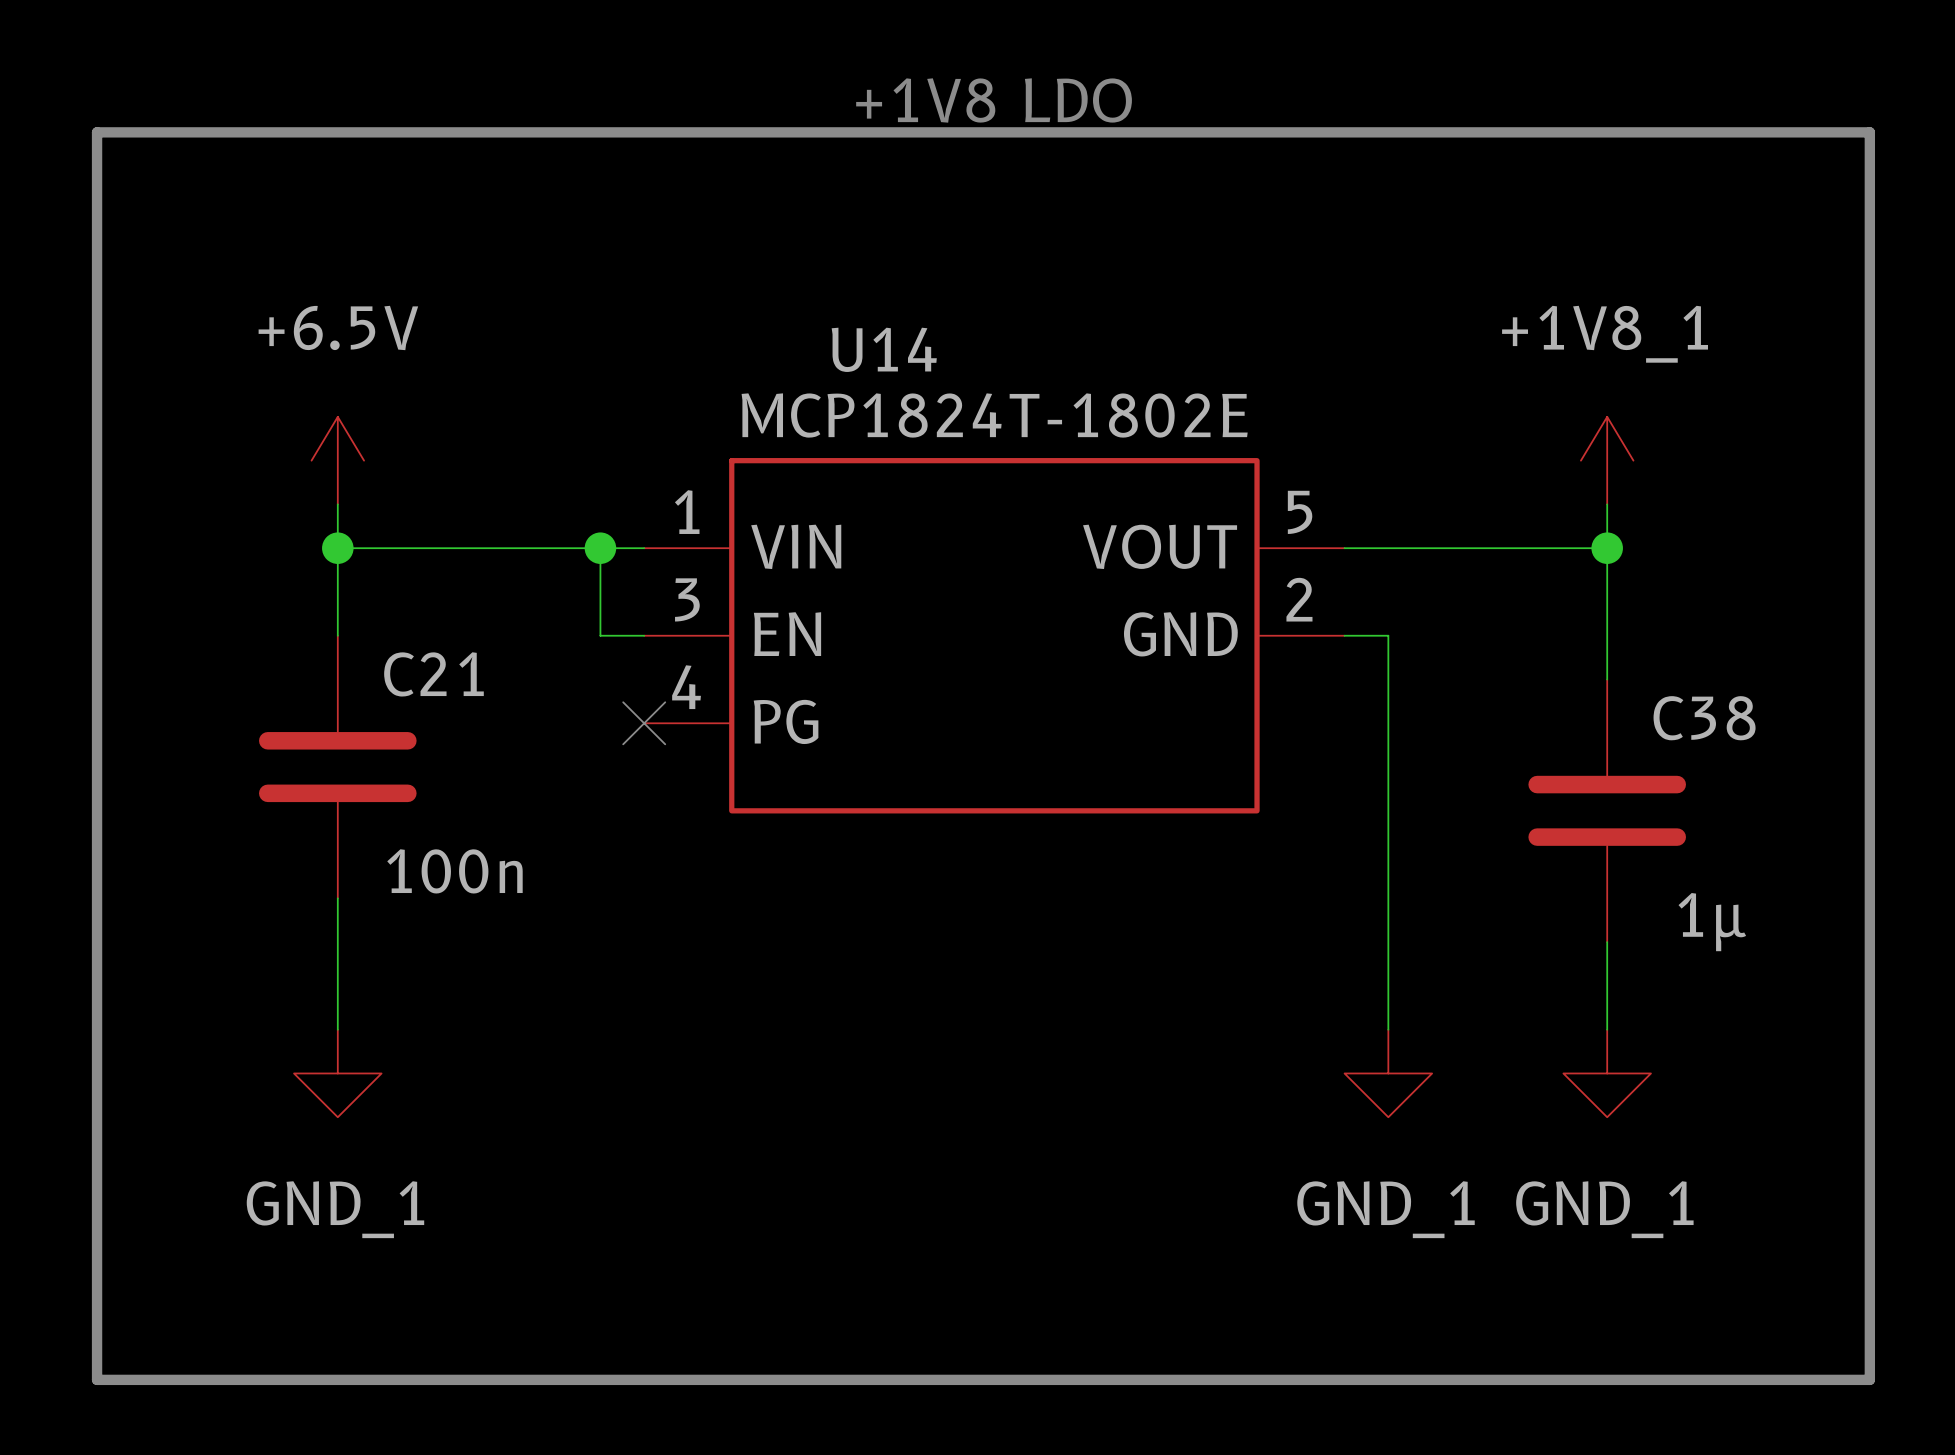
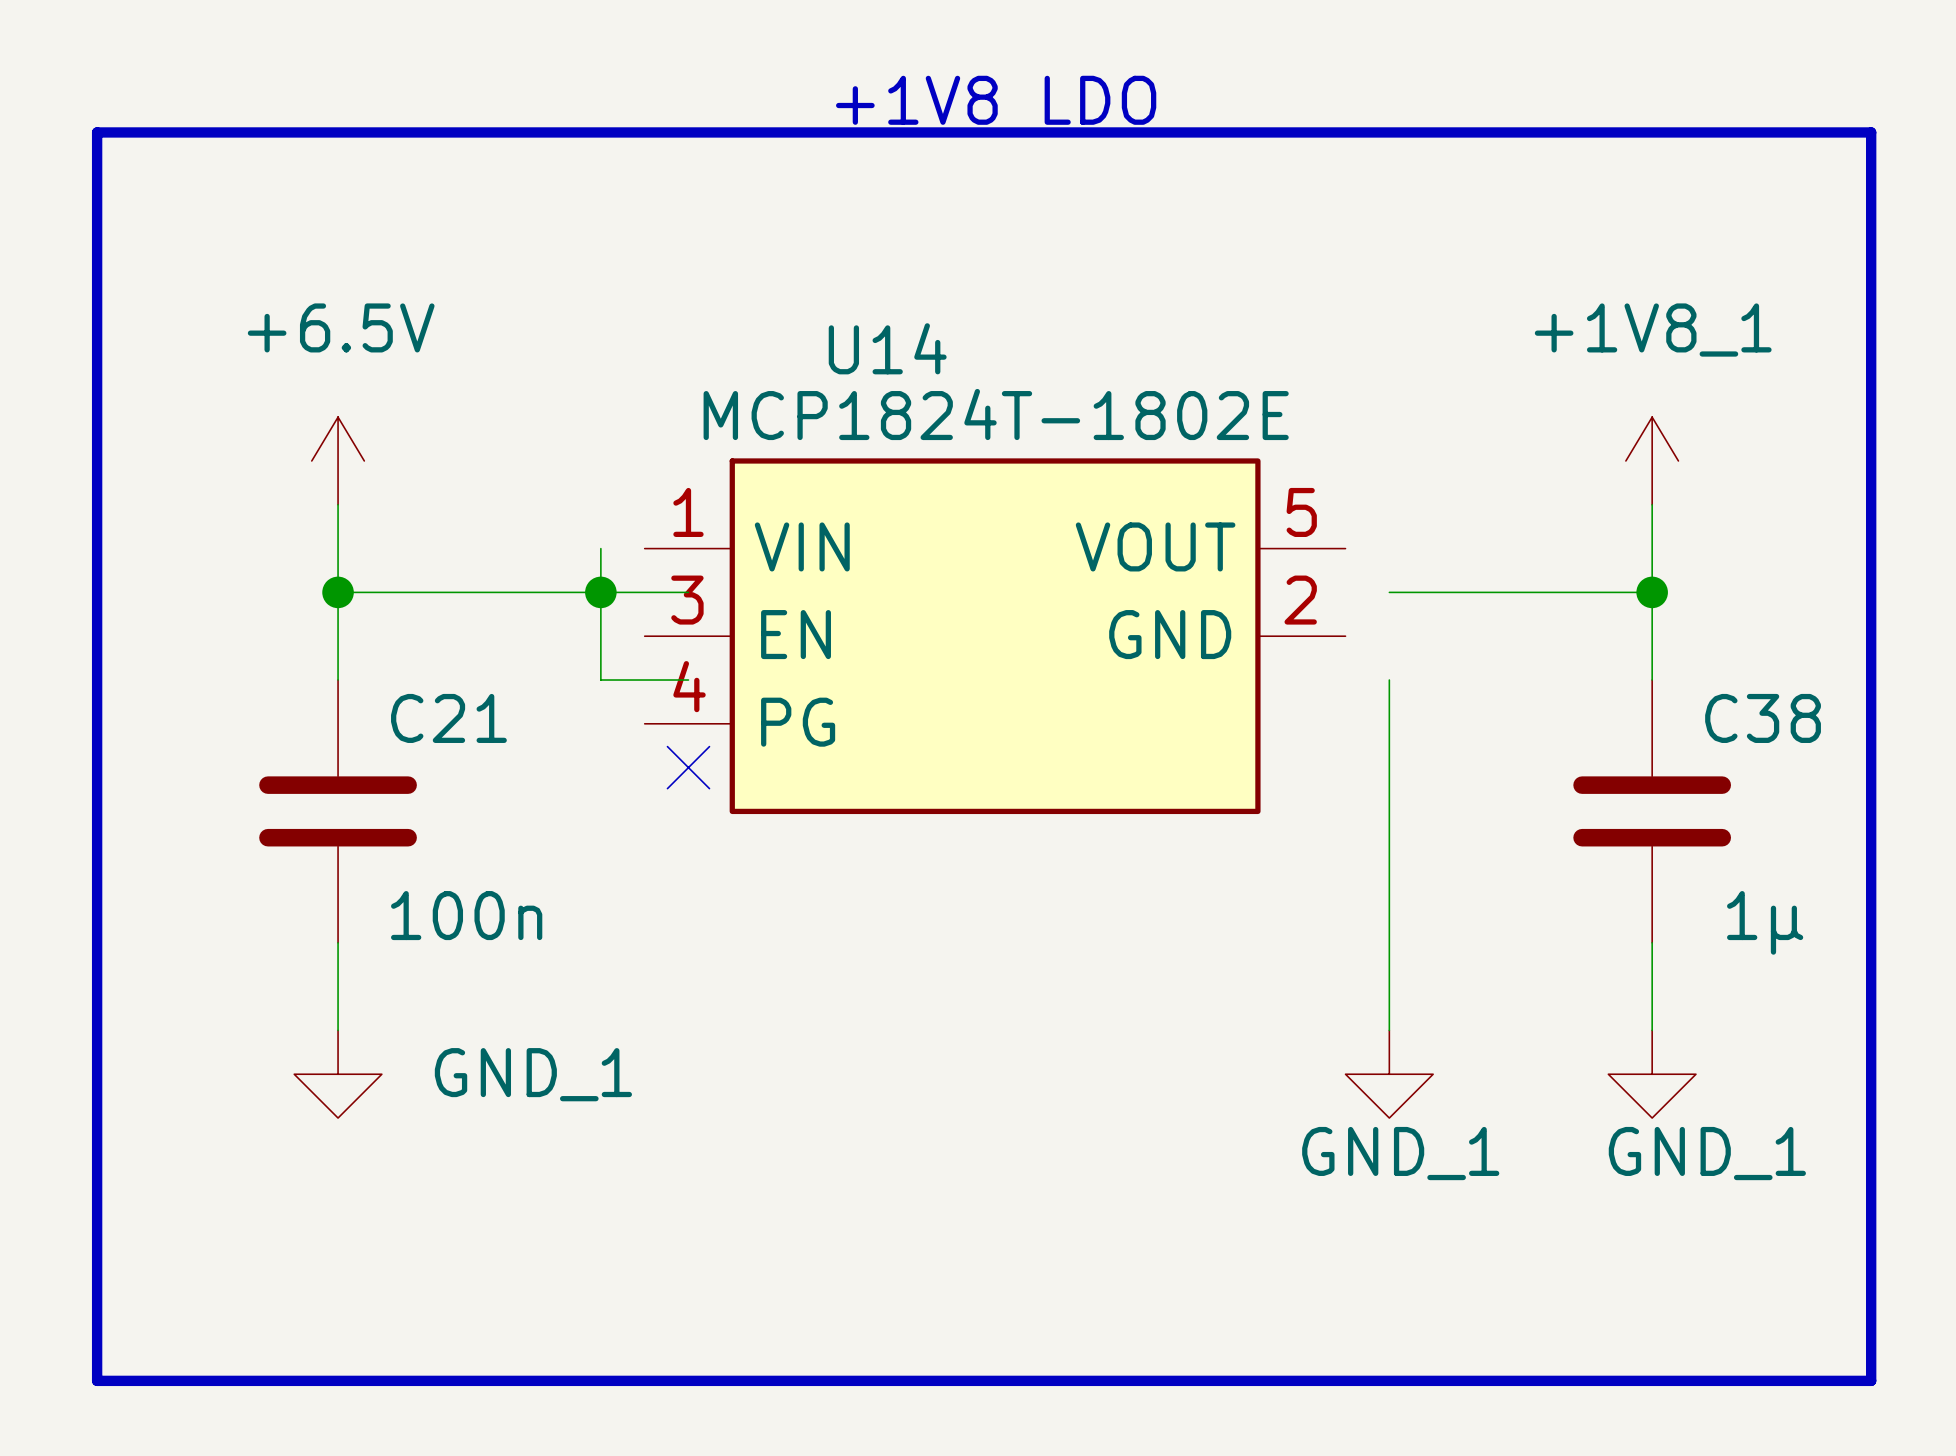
power symbol position: +1V8_1 (1607, 460) -> +1V8_1 (1652, 460)
wire: (1607, 504) (1607, 679) -> (1652, 504) (1652, 680)
wire: (337, 548) (644, 548) -> none
junction position: (337, 548) -> (338, 592)
junction position: (600, 548) -> (600, 592)
wire: (1344, 548) (1607, 548) -> (1389, 592) (1652, 592)
junction position: (1607, 548) -> (1652, 592)
wire: none -> (338, 592) (688, 592)
wire: (600, 635) (644, 635) -> (600, 636) (600, 680) (688, 680)
wire: (1344, 635) (1388, 635) (1388, 679) -> none
no-connect mark position: (644, 723) -> (688, 767)
C21 position: (337, 767) -> (338, 811)
C38 position: (1607, 810) -> (1652, 811)
wire: (1607, 942) (1607, 1029) -> (1652, 942) (1652, 1030)
power symbol position: GND_1 (1607, 1073) -> GND_1 (1652, 1074)
power symbol text position: GND_1 (335, 1209) -> GND_1 (533, 1074)
power symbol text position: GND_1 (1386, 1209) -> GND_1 (1400, 1153)
power symbol text position: GND_1 (1604, 1209) -> GND_1 (1707, 1153)

